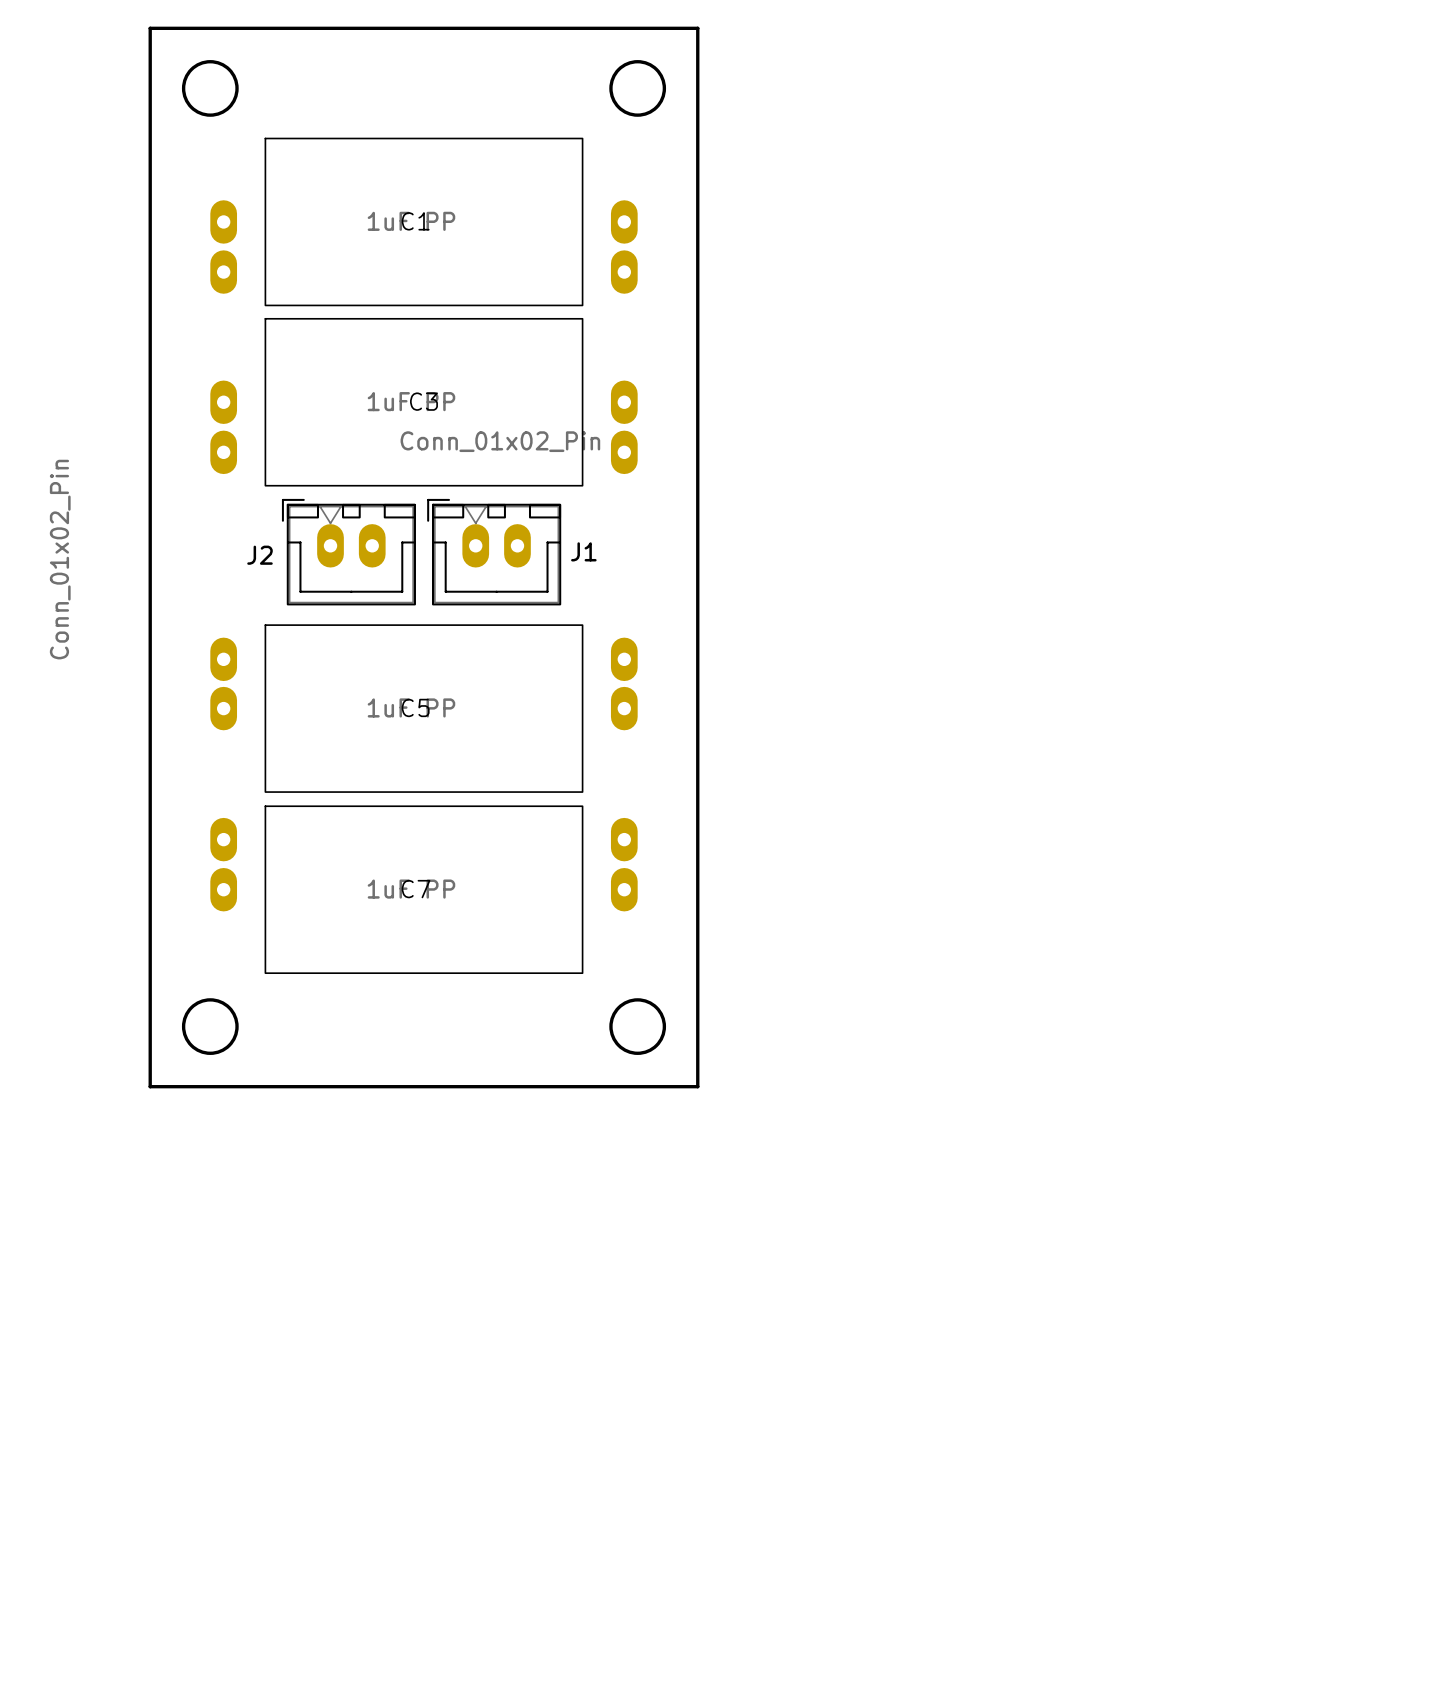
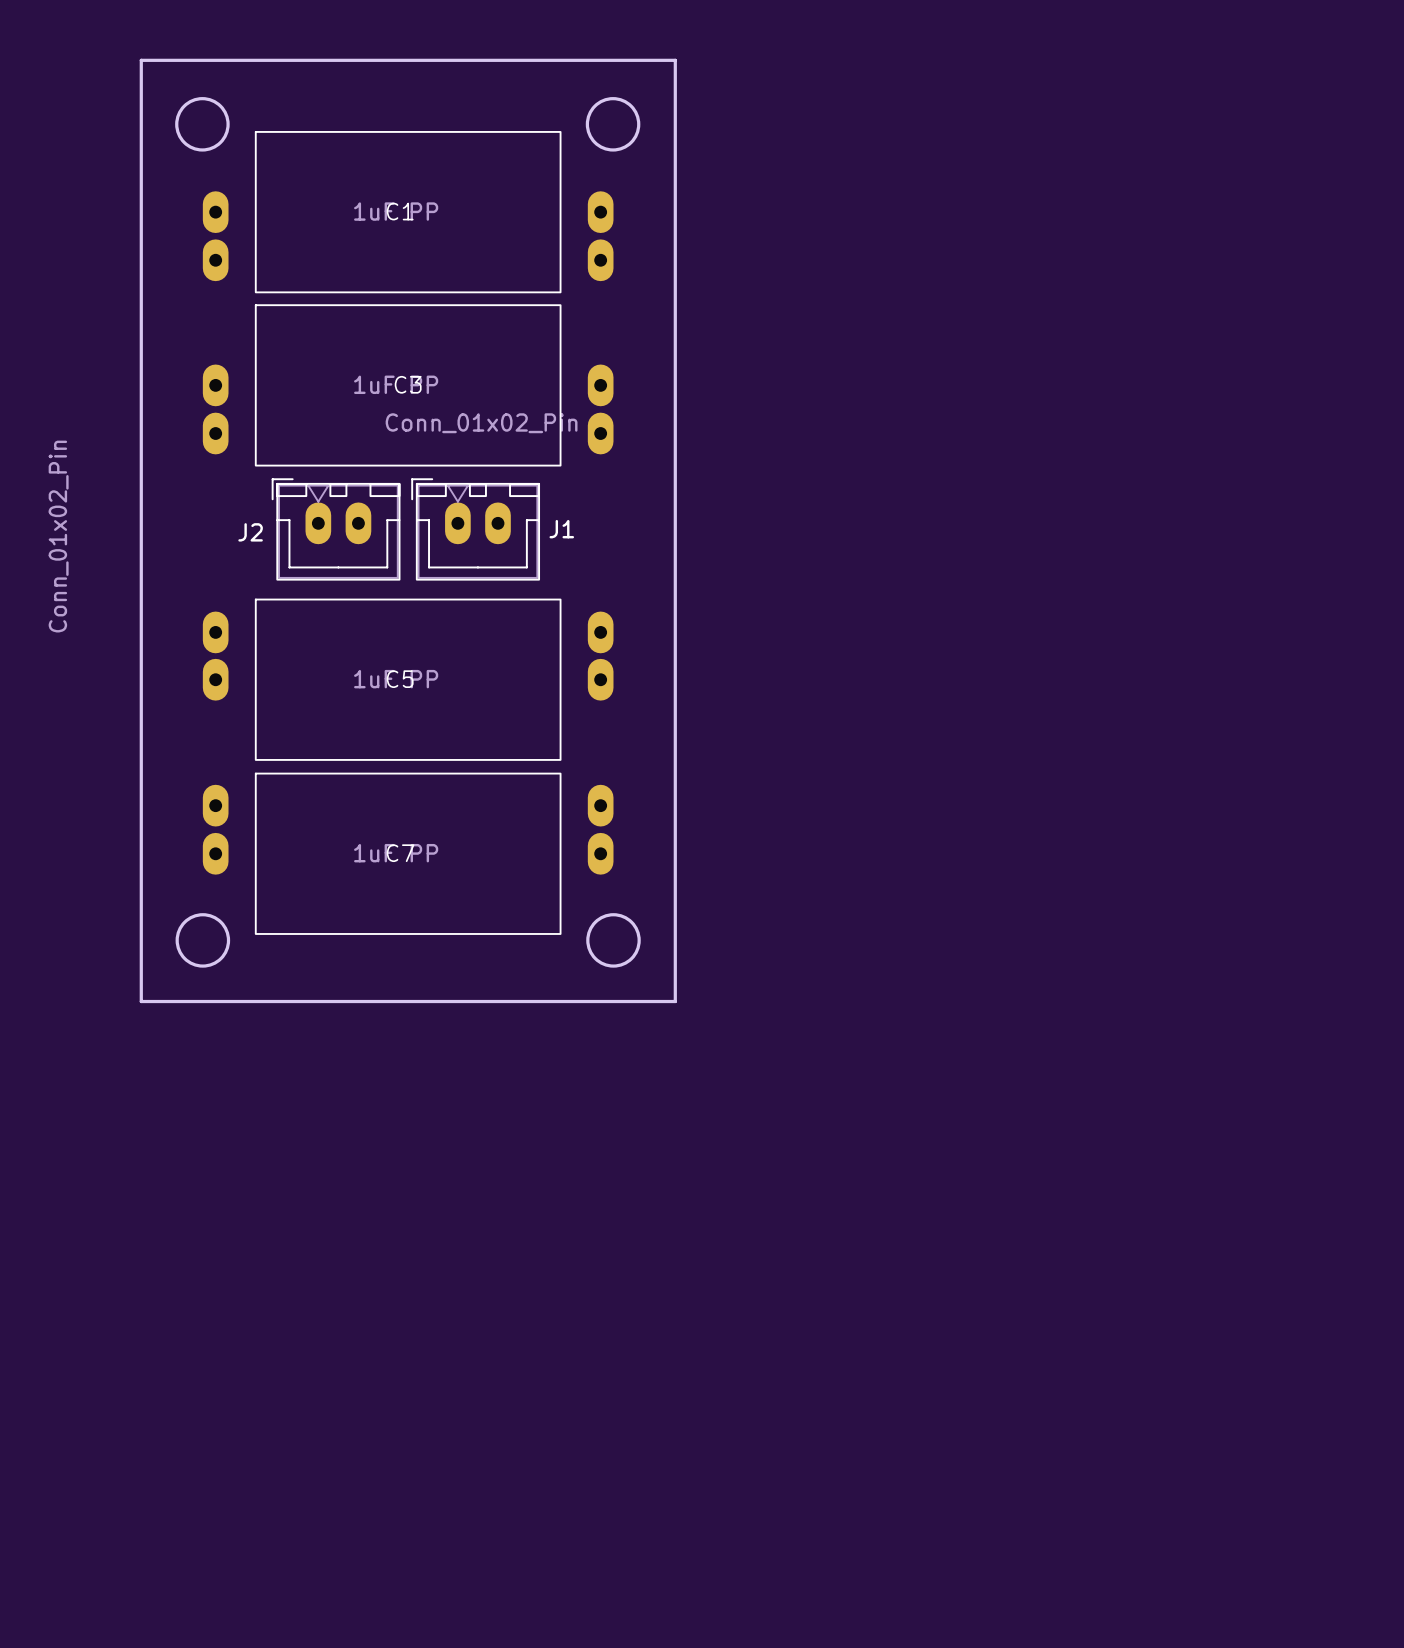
board edge: (150, 28) (697, 28) (697, 1086) (150, 1086) (150, 28) -> (141, 60) (141, 1001) (675, 1001) (675, 60) (141, 60)
round board edge position: (210, 88) -> (202, 124)
round board edge position: (637, 88) -> (613, 124)
round board edge position: (210, 1026) -> (202, 940)
round board edge position: (637, 1026) -> (613, 940)

